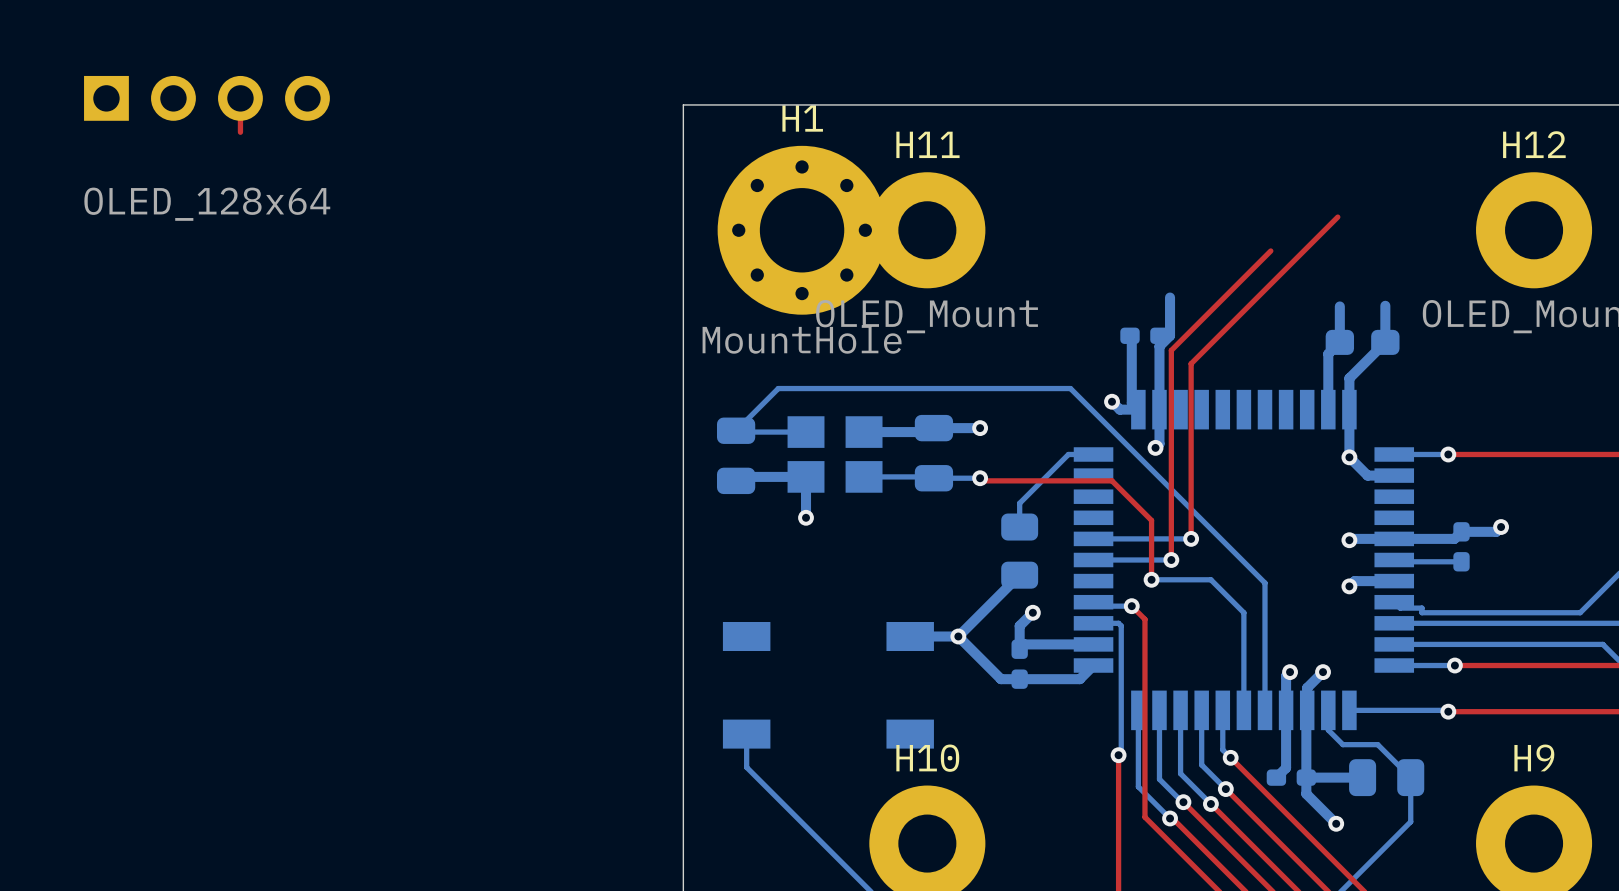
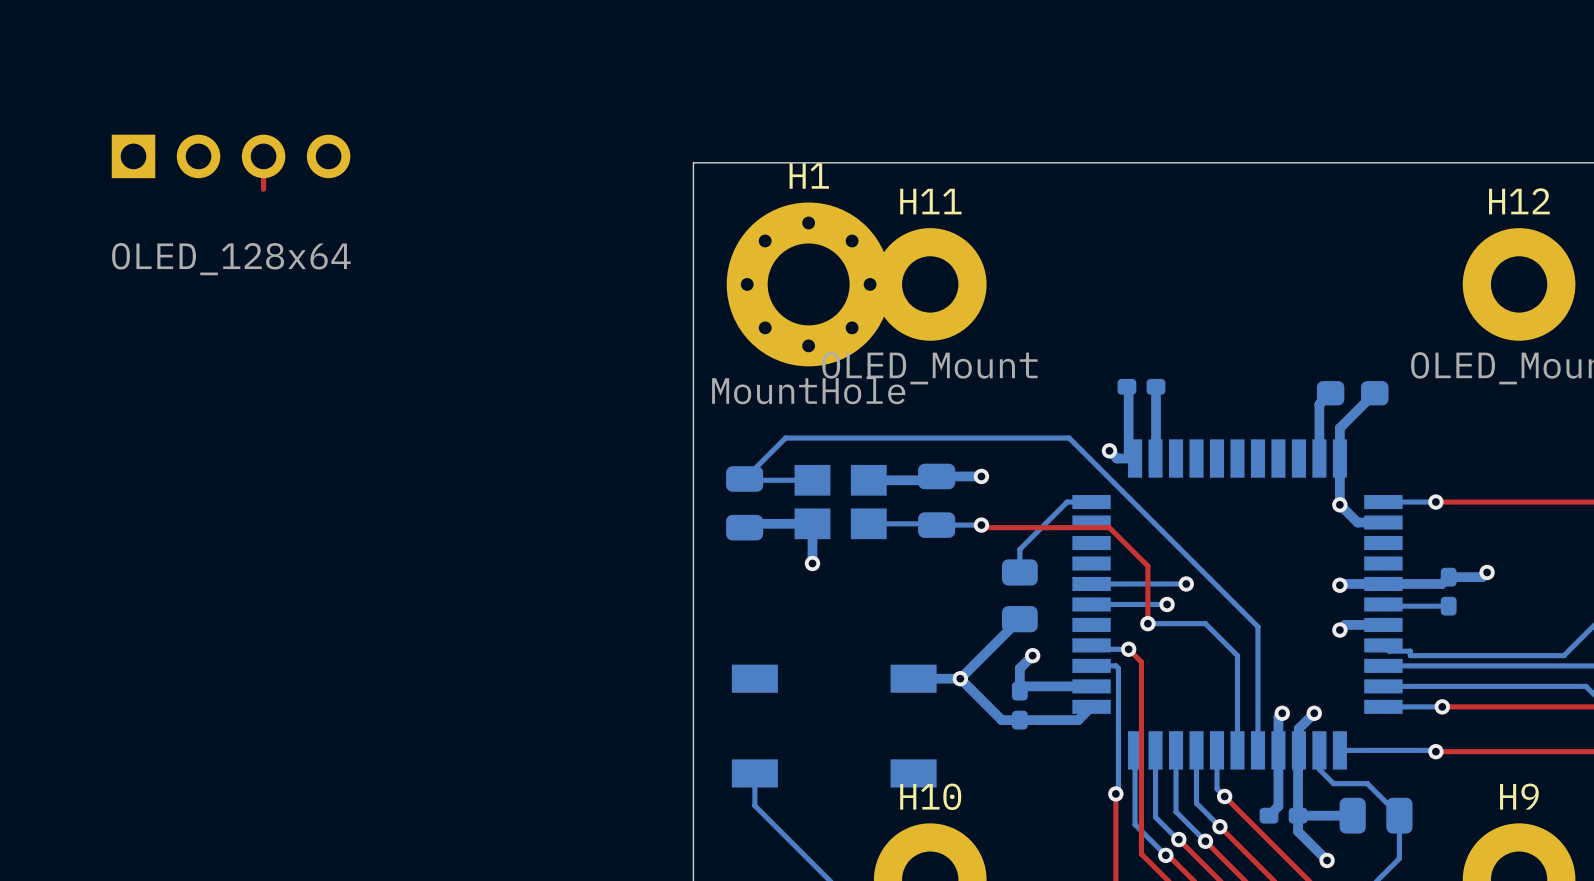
top track: (1337, 217) (1191, 363) (1191, 538) -> none
top track: (1270, 250) (1171, 350) (1171, 560) -> none
bottom track: (1170, 297) (1170, 335) (1159, 346) (1159, 443) (1155, 447) -> none
bottom track: (1385, 305) (1385, 342) -> none
bottom track: (1339, 306) (1339, 342) -> none
bottom track: none -> (1155, 386) (1155, 458)
via: (1155, 447) -> none

